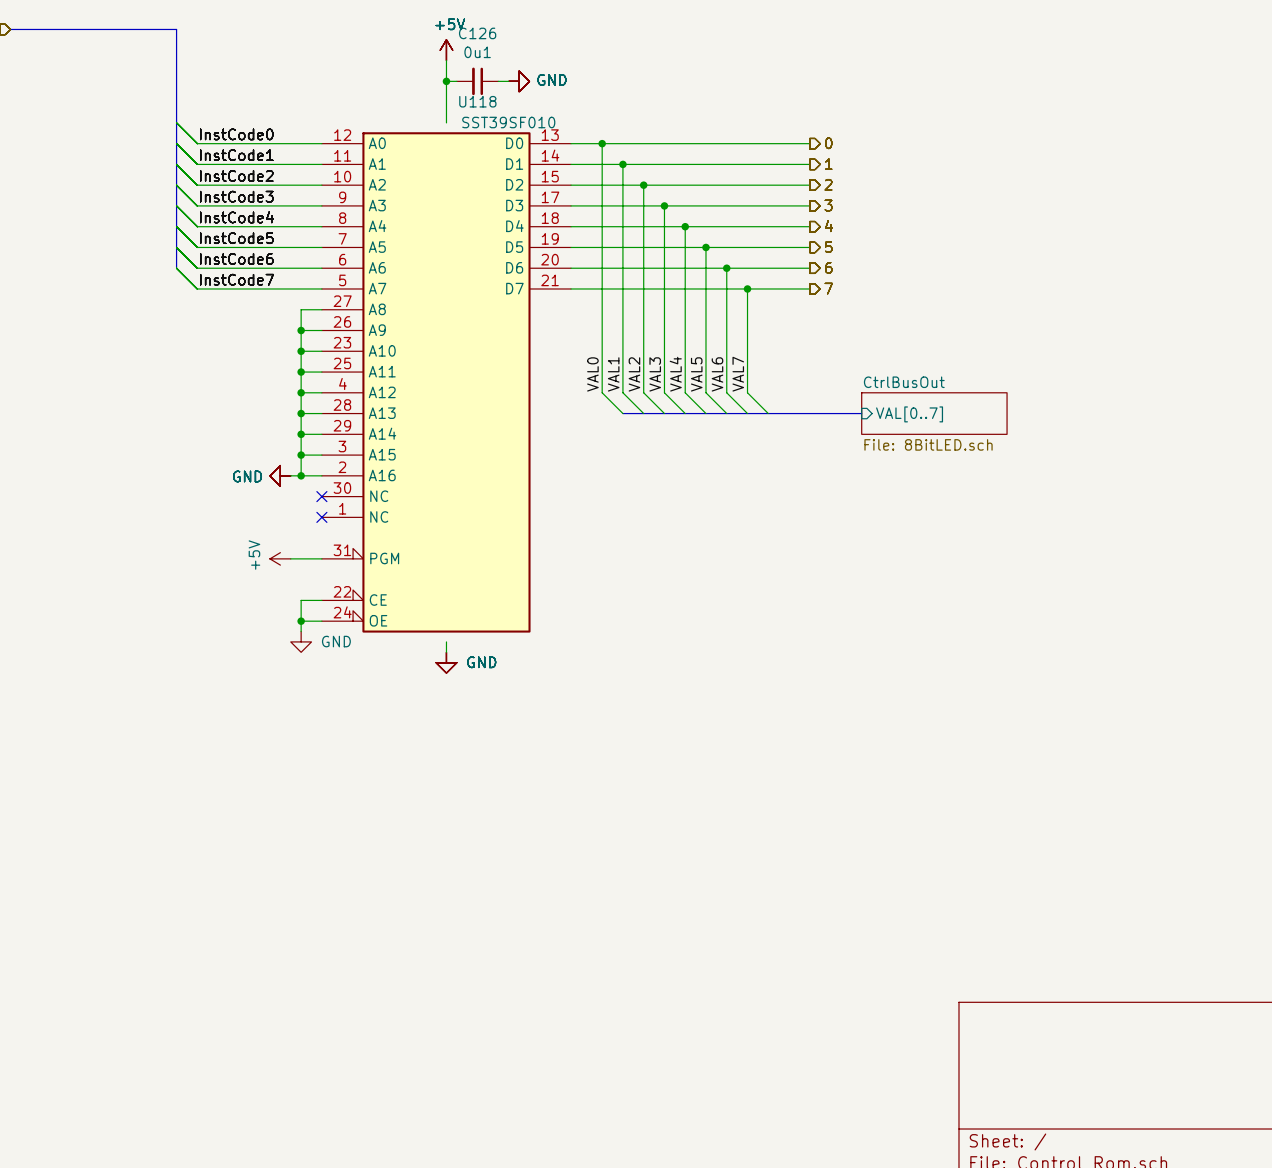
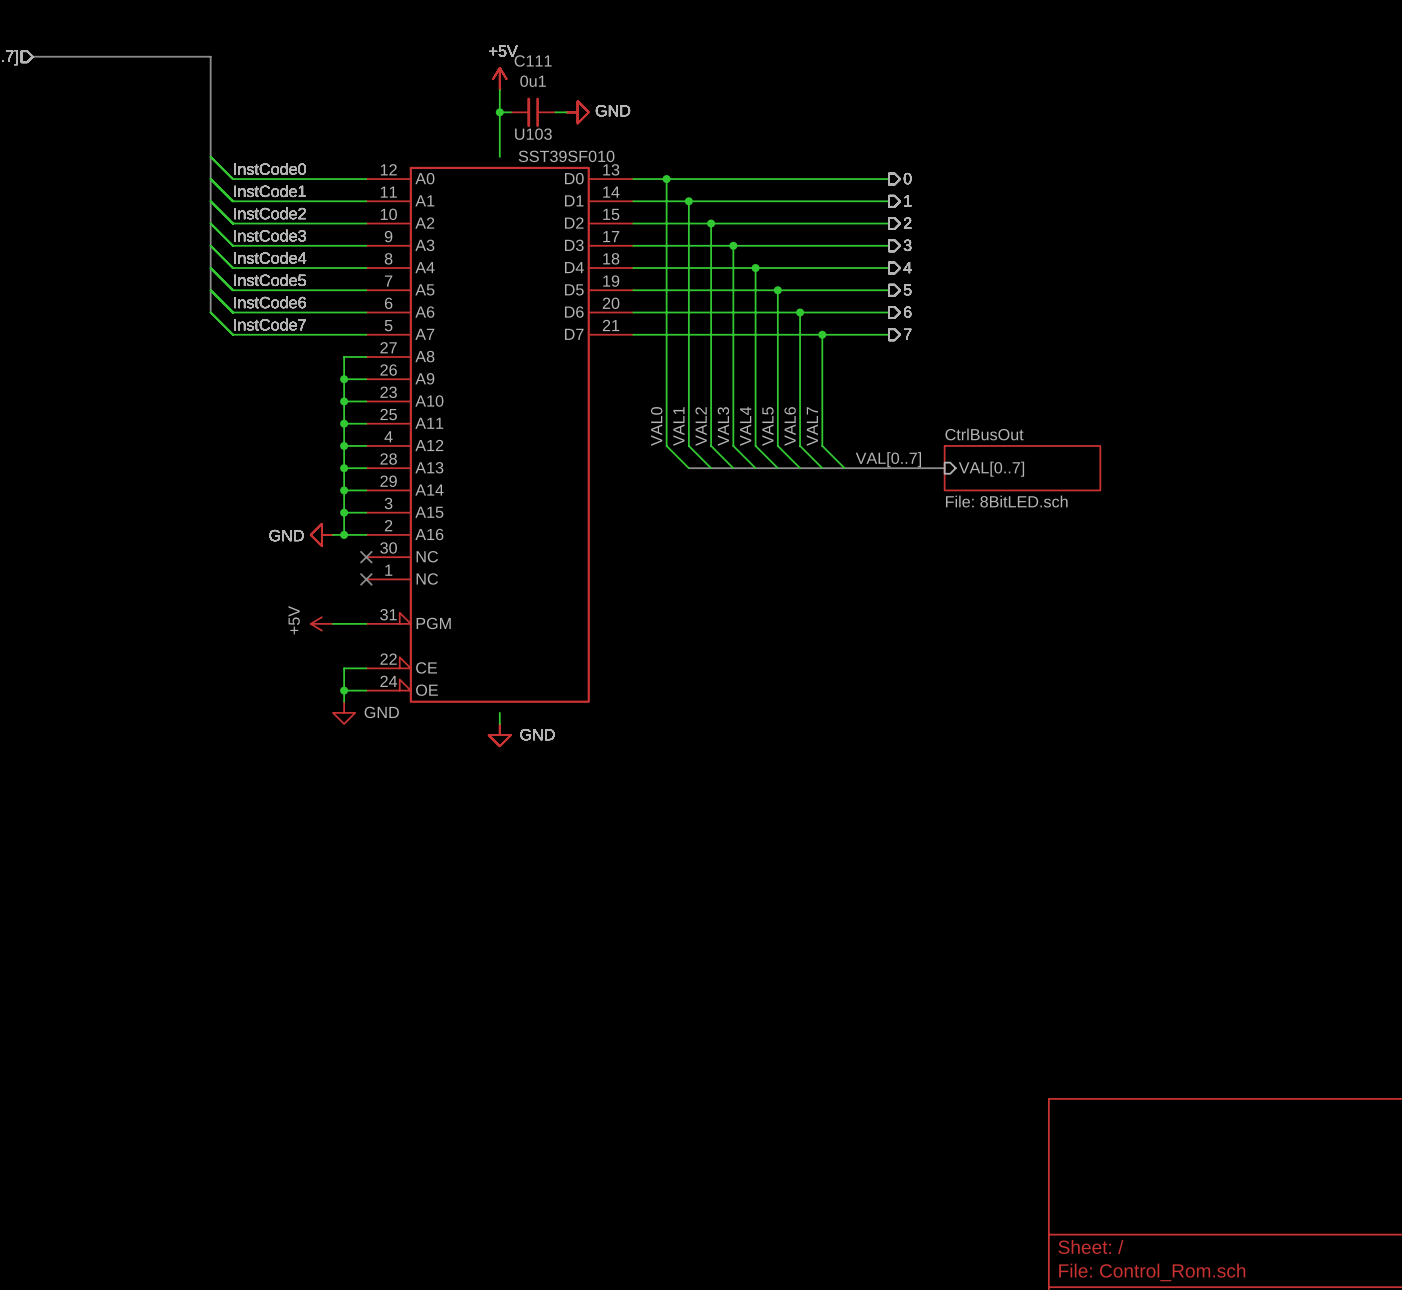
C126 name: C126 (477, 33) -> C111 (533, 60)
U118 name: U118 (477, 101) -> U103 (533, 134)
label: none -> VAL[0..7] (888, 459)

